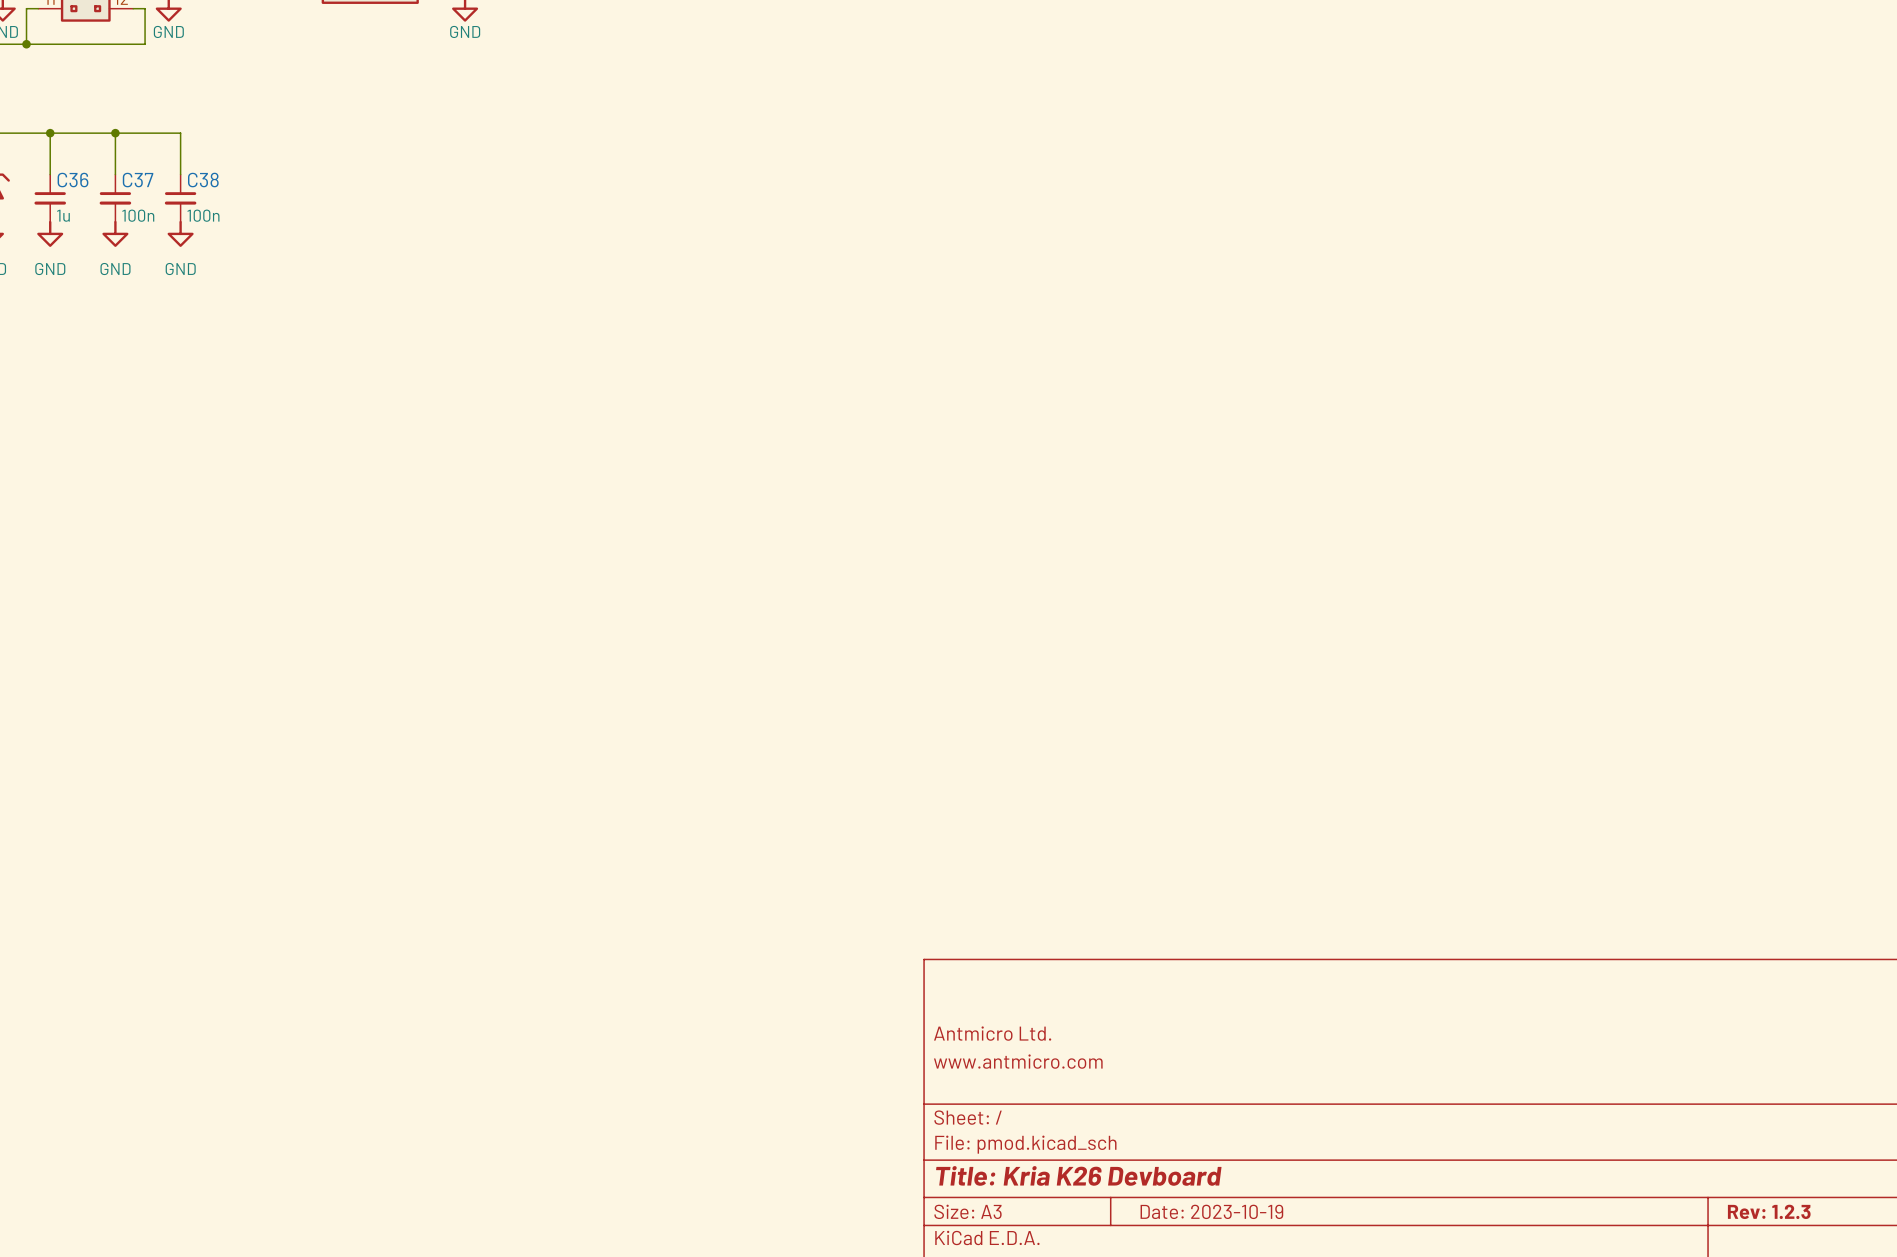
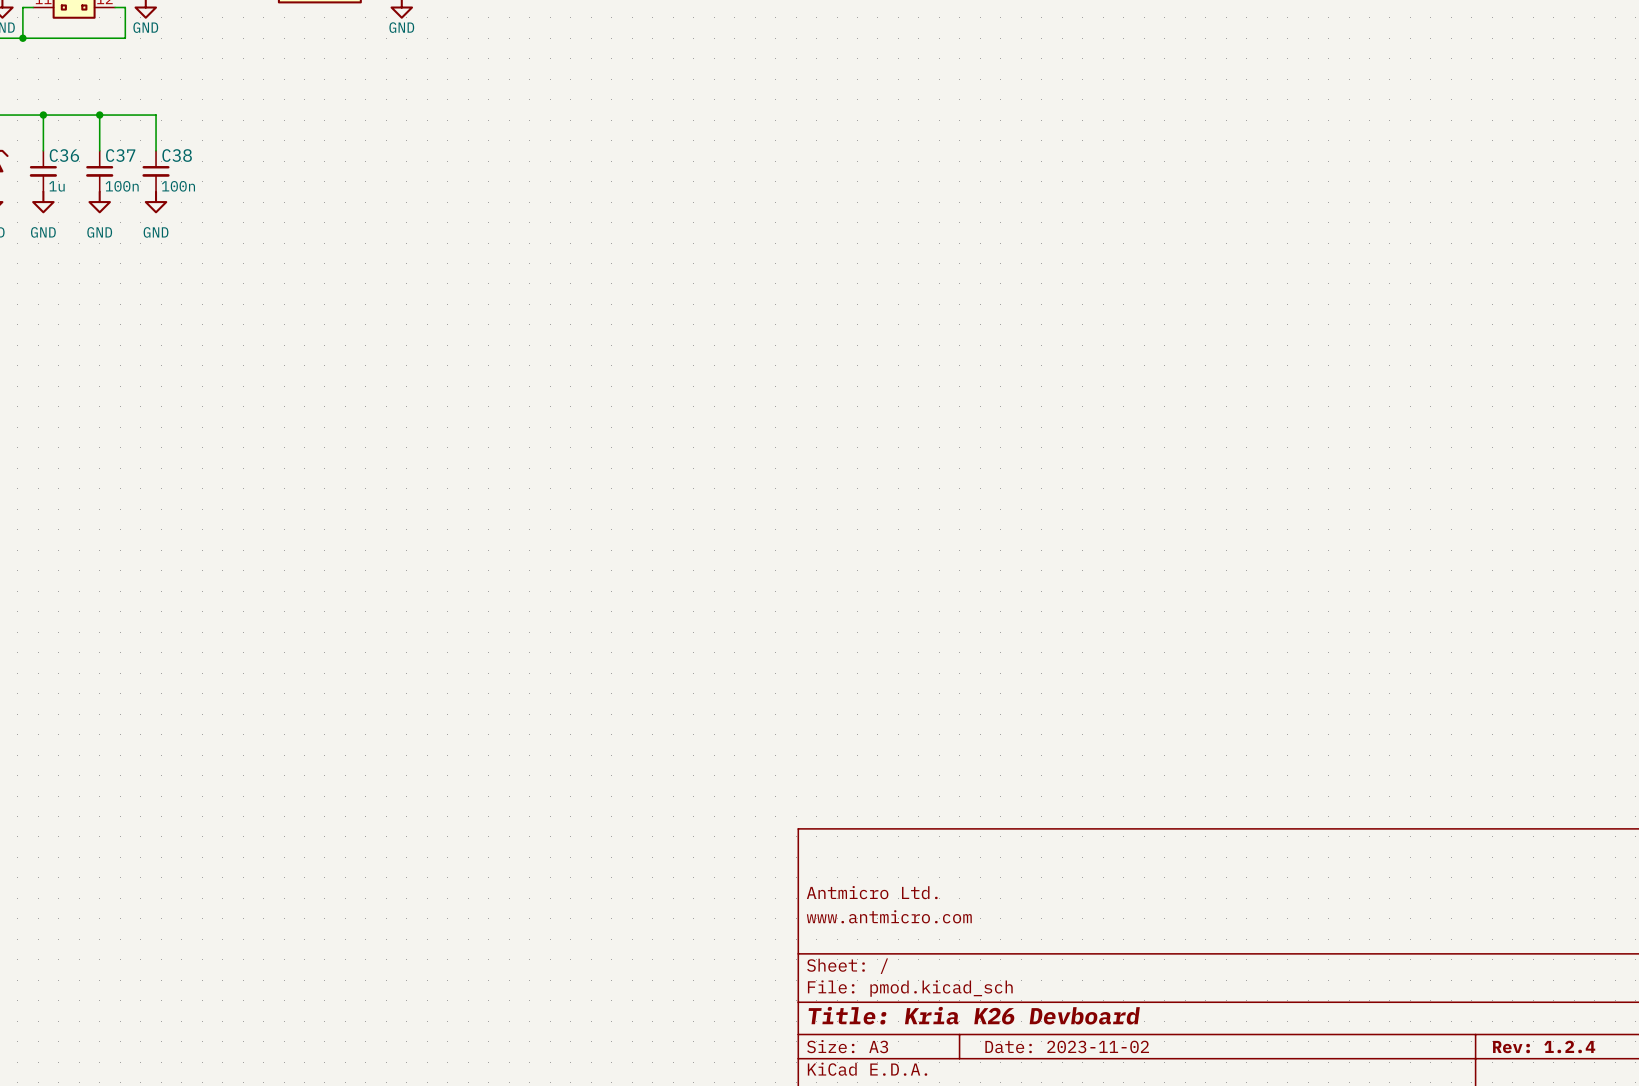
title block: Date: 2023-10-19 (1211, 1211) -> Date: 2023-11-02 (1067, 1046)
title block: Rev: 1.2.3 (1769, 1211) -> Rev: 1.2.4 (1544, 1046)

